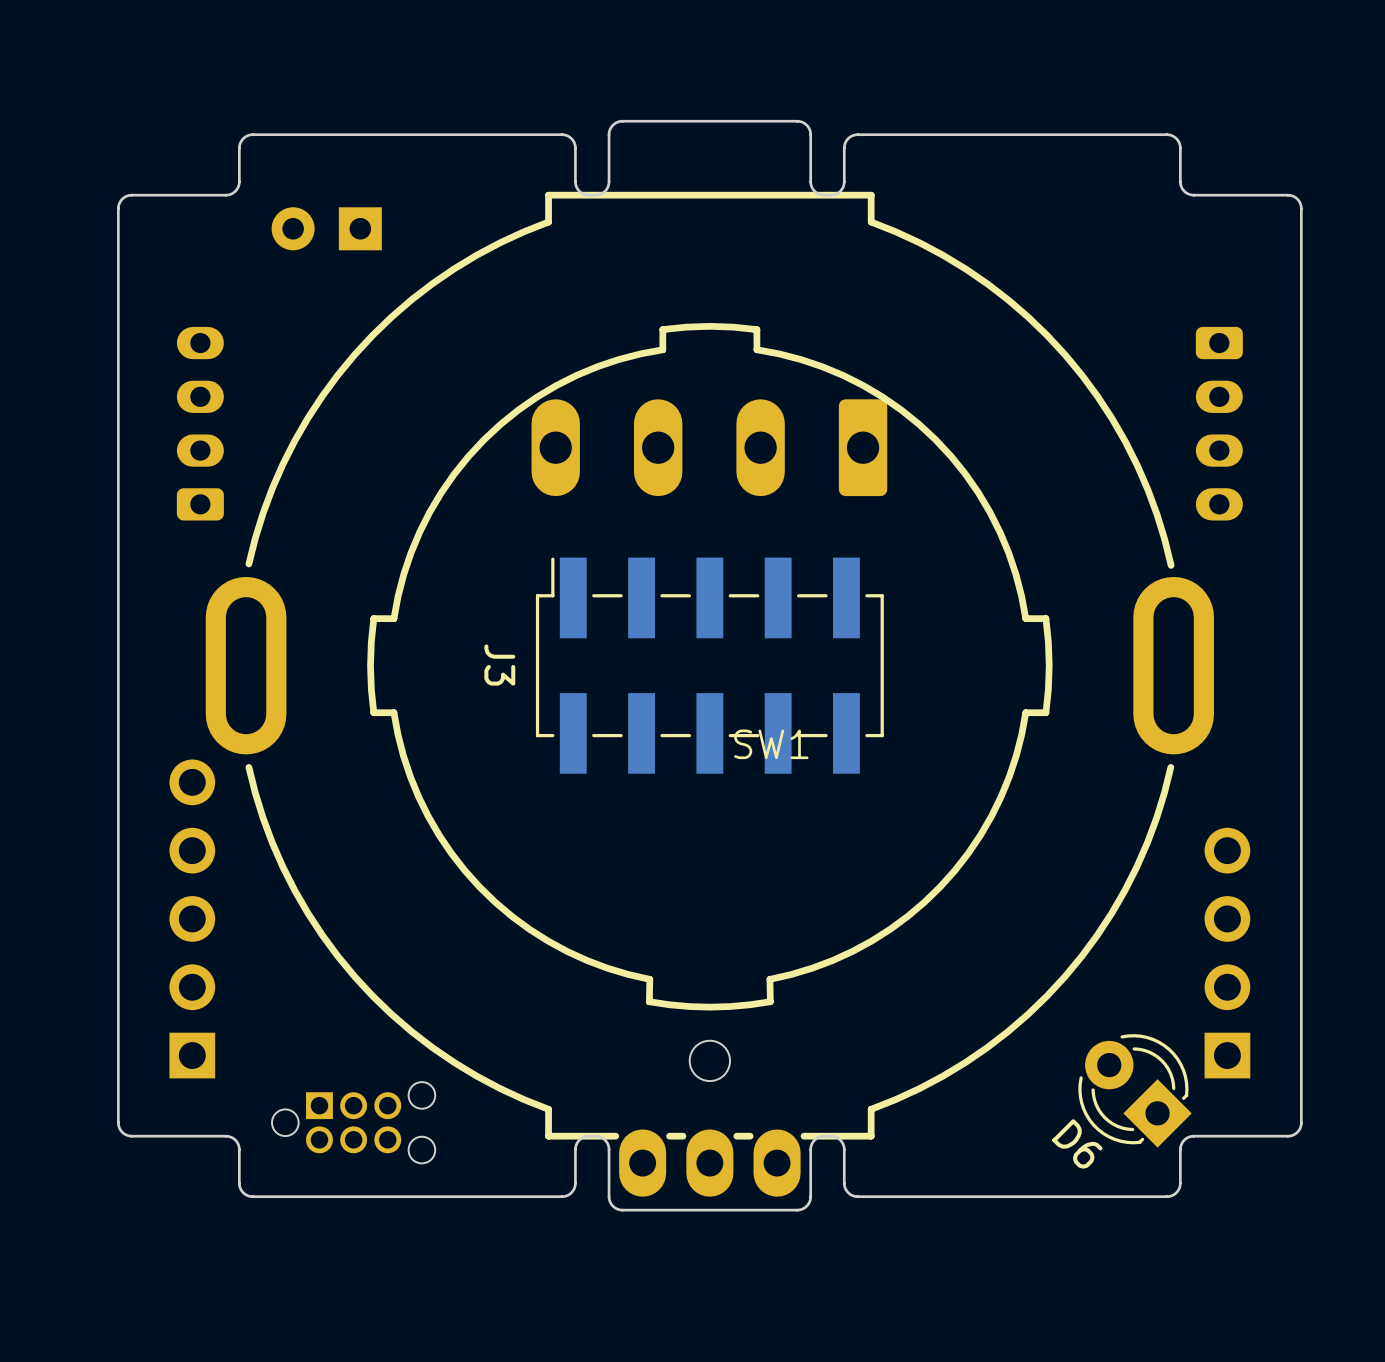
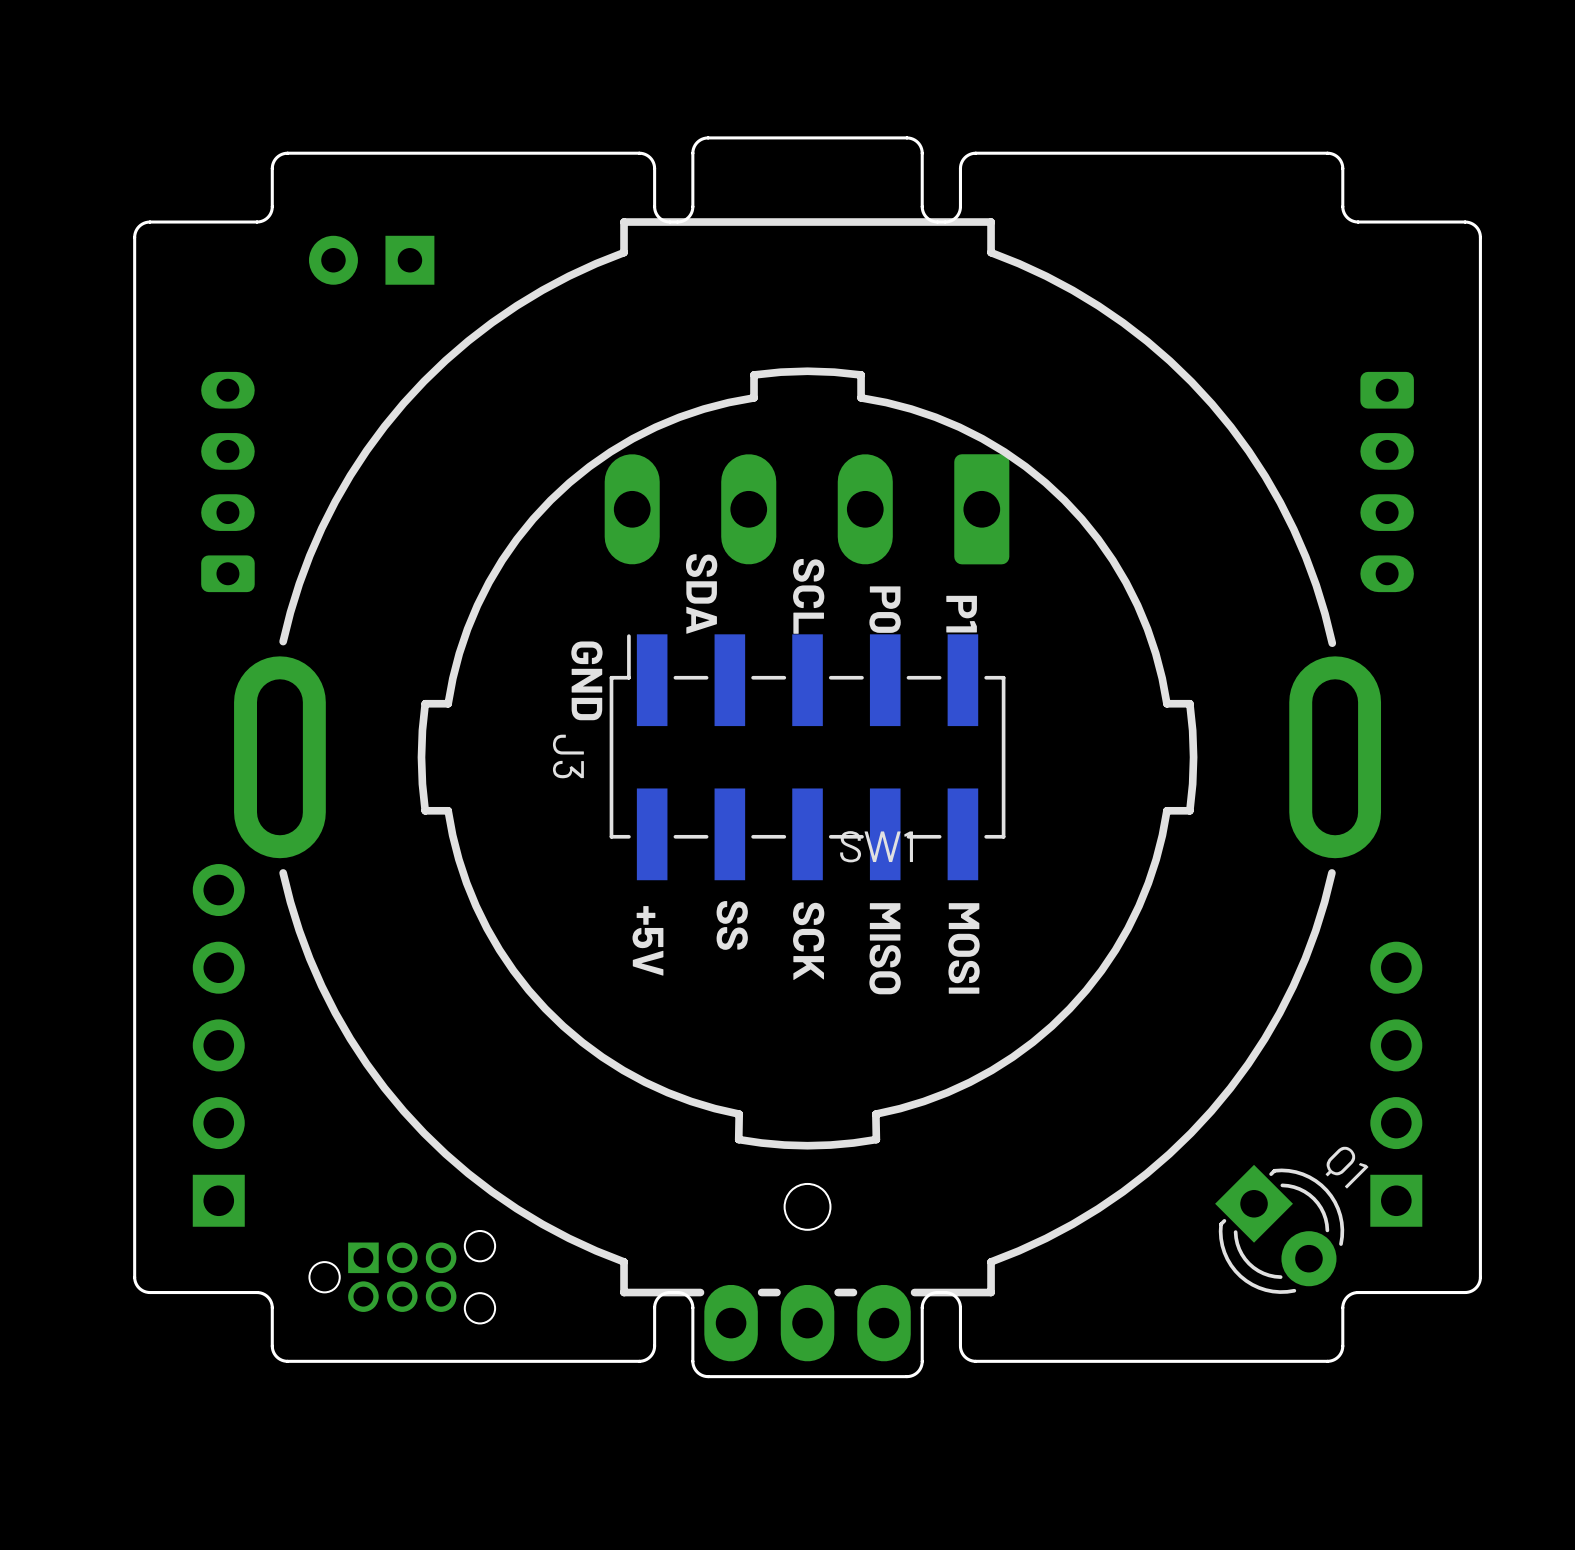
text: none -> SDA (701, 593)
text: none -> SCL (808, 596)
text: none -> P0 (885, 609)
text: none -> P1 (961, 614)
text: none -> GND (586, 680)
text: none -> SS (732, 925)
text: none -> SCK (808, 941)
text: none -> +5V (647, 940)
text: none -> MOSI (963, 948)
text: none -> MISO (885, 948)
Q1: none -> (1279, 1229)
D6: (1135, 1090) -> none

